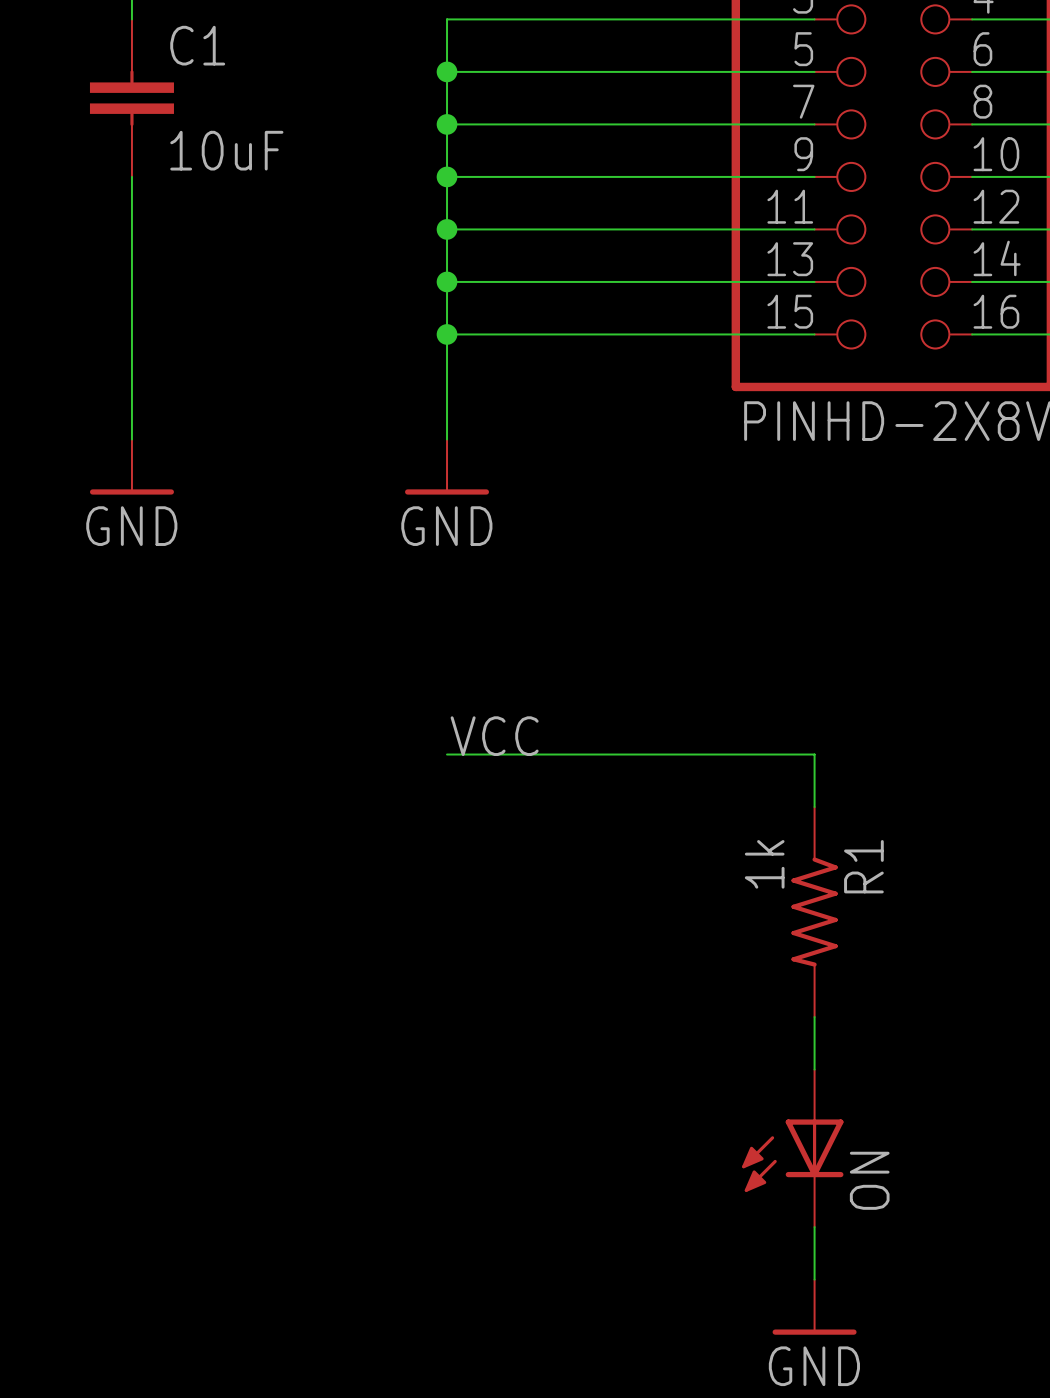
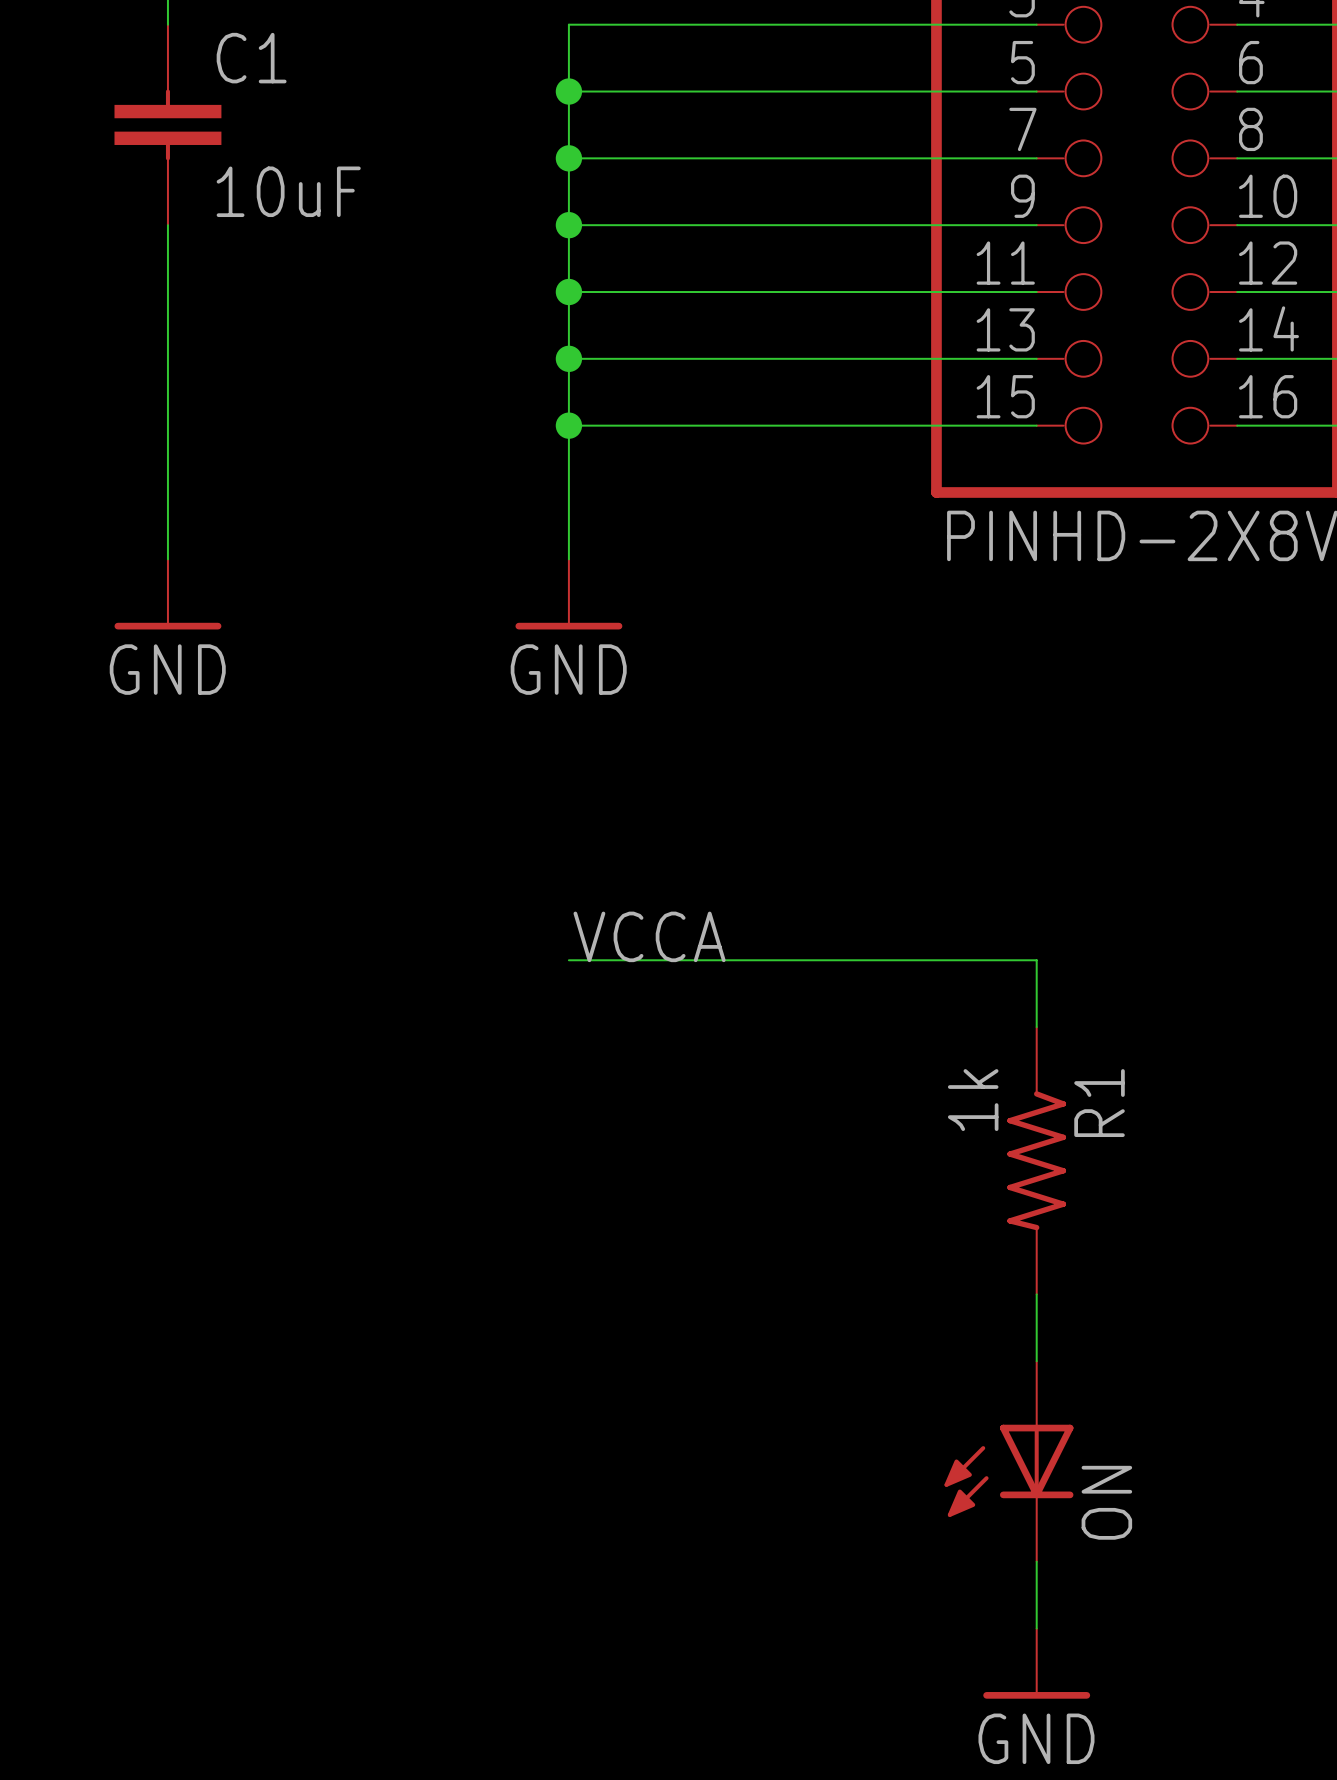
label: VCC (494, 736) -> VCCA (649, 936)

